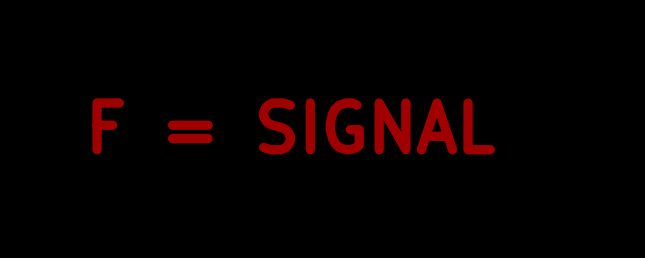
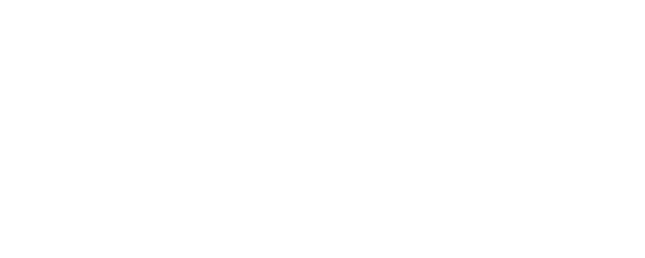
text: F = SIGNAL (293, 126) -> none

